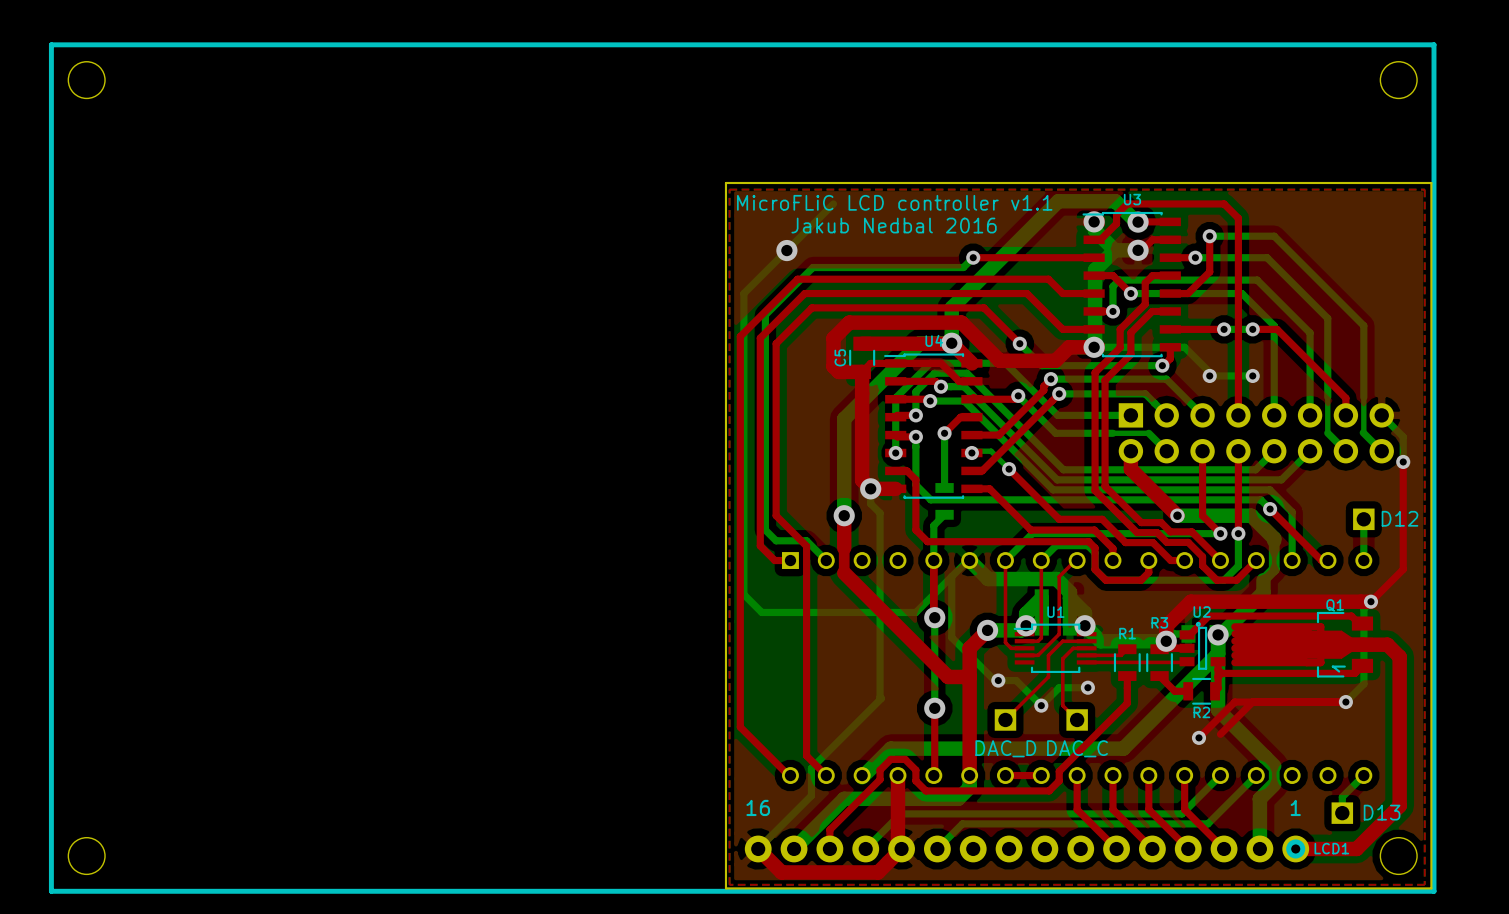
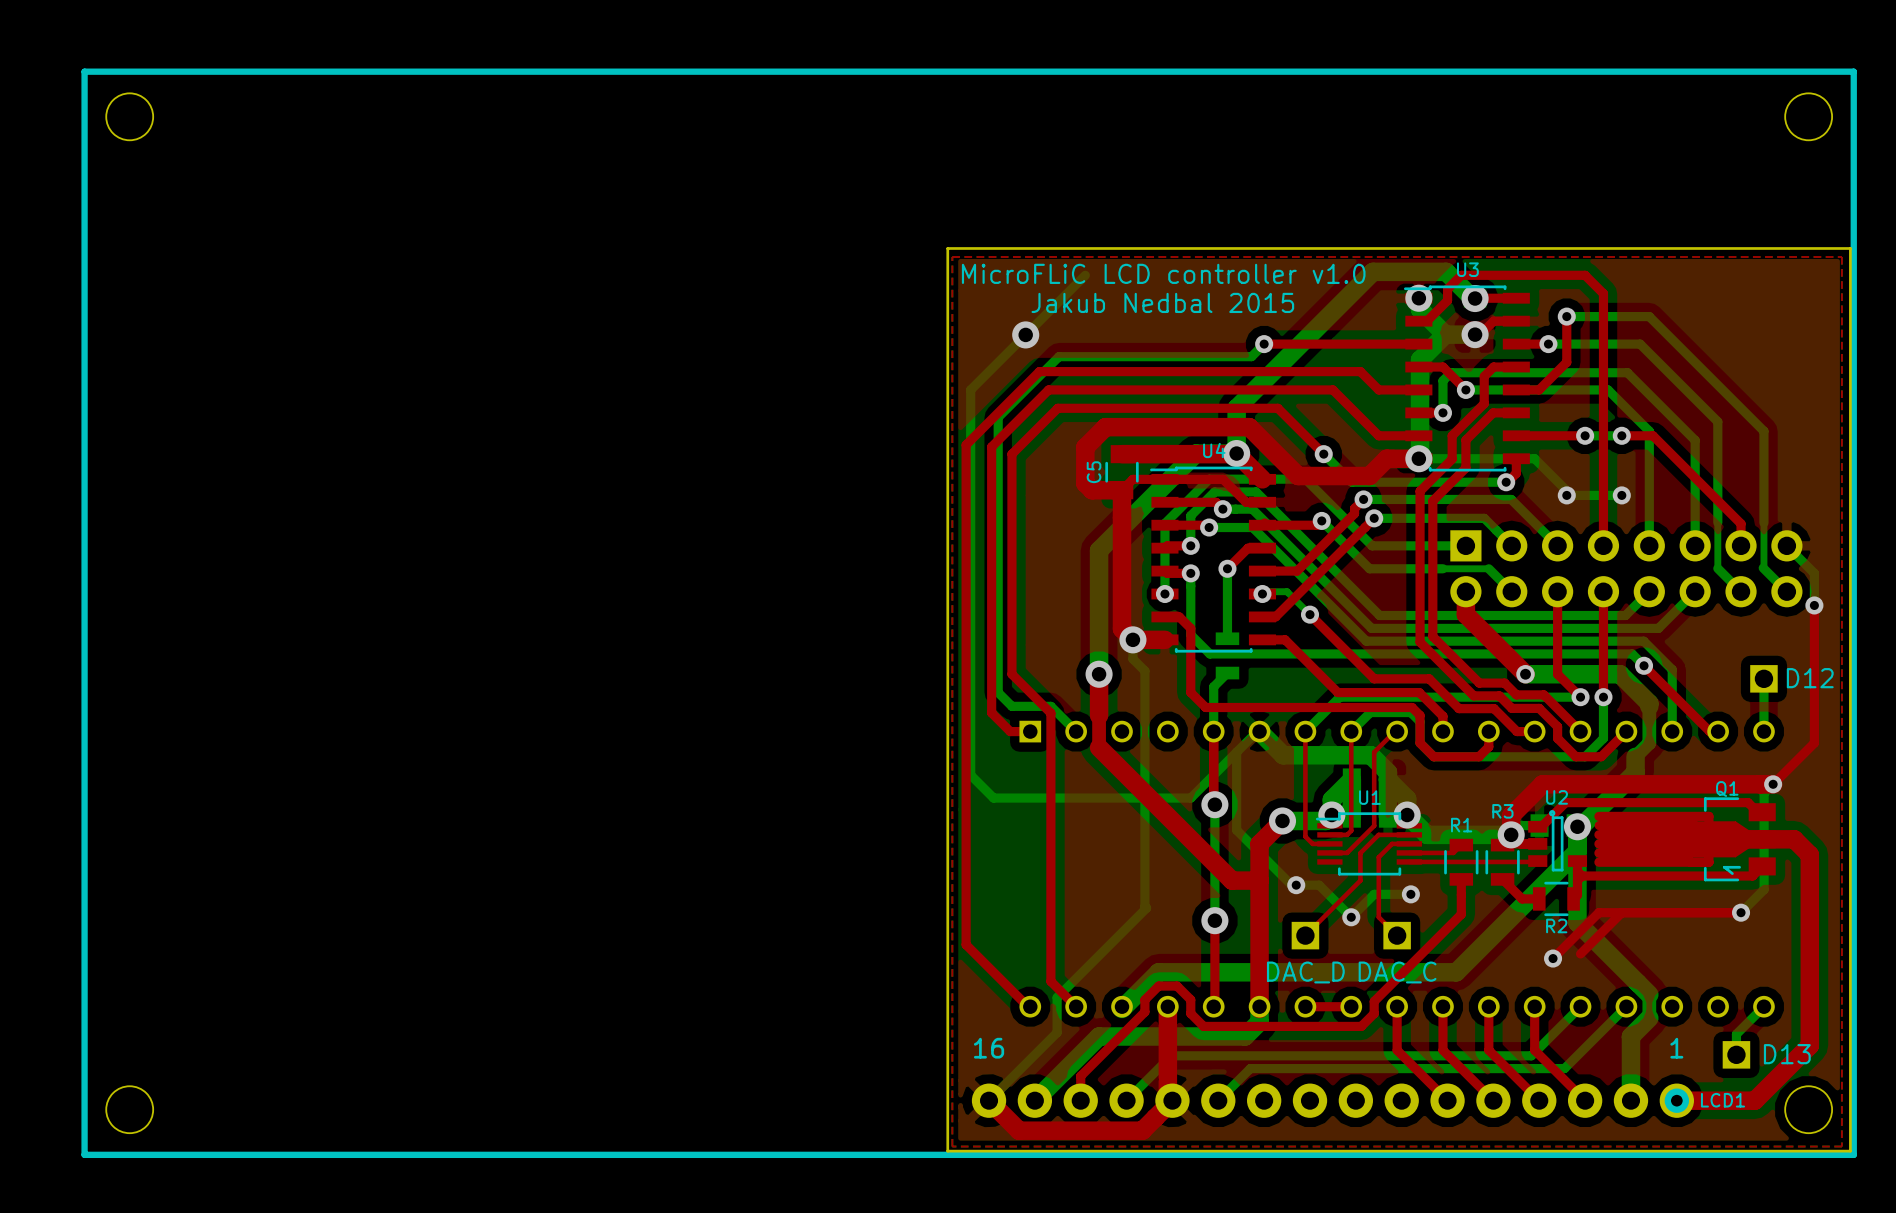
text: MicroFLiC LCD controller v1.1 (894, 202) -> MicroFLiC LCD controller v1.0 (1163, 273)
text: Jakub Nedbal 2016 (894, 225) -> Jakub Nedbal 2015 (1162, 302)

